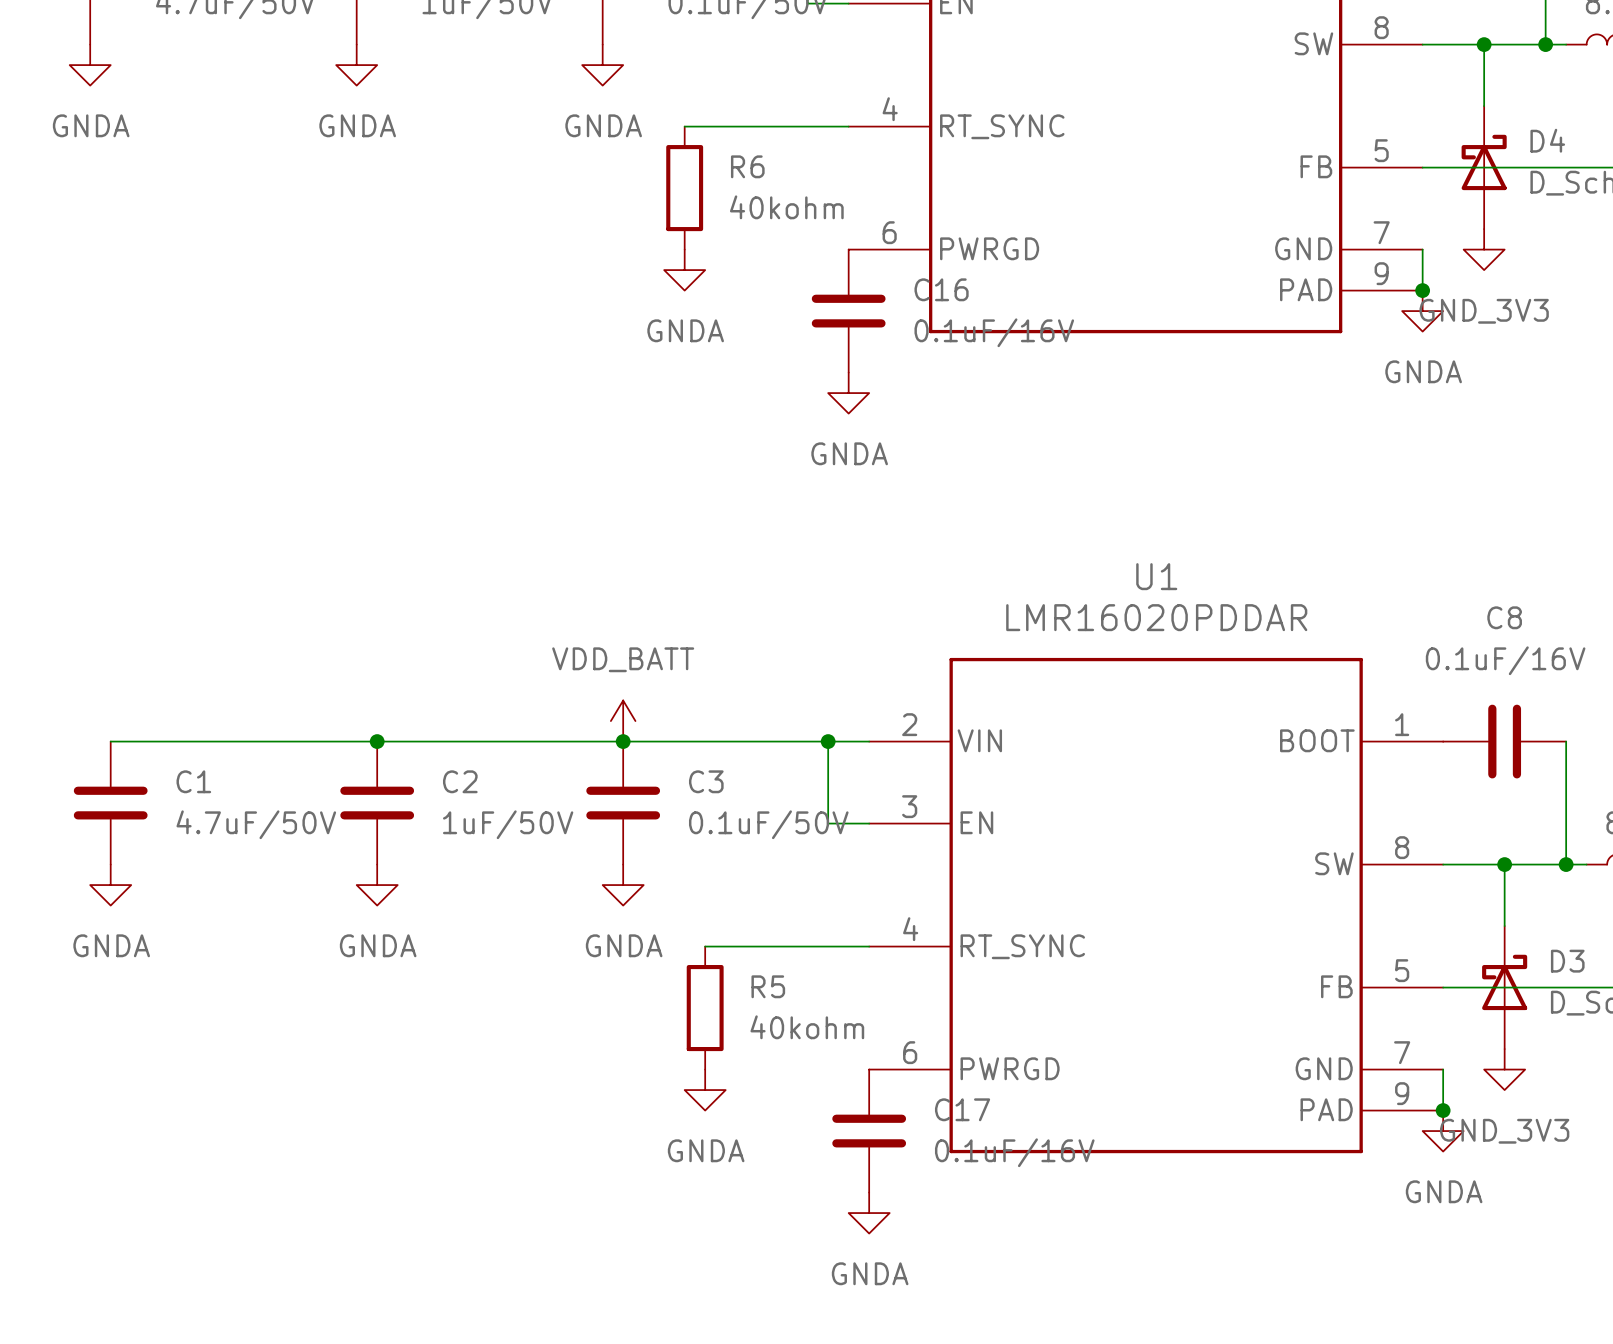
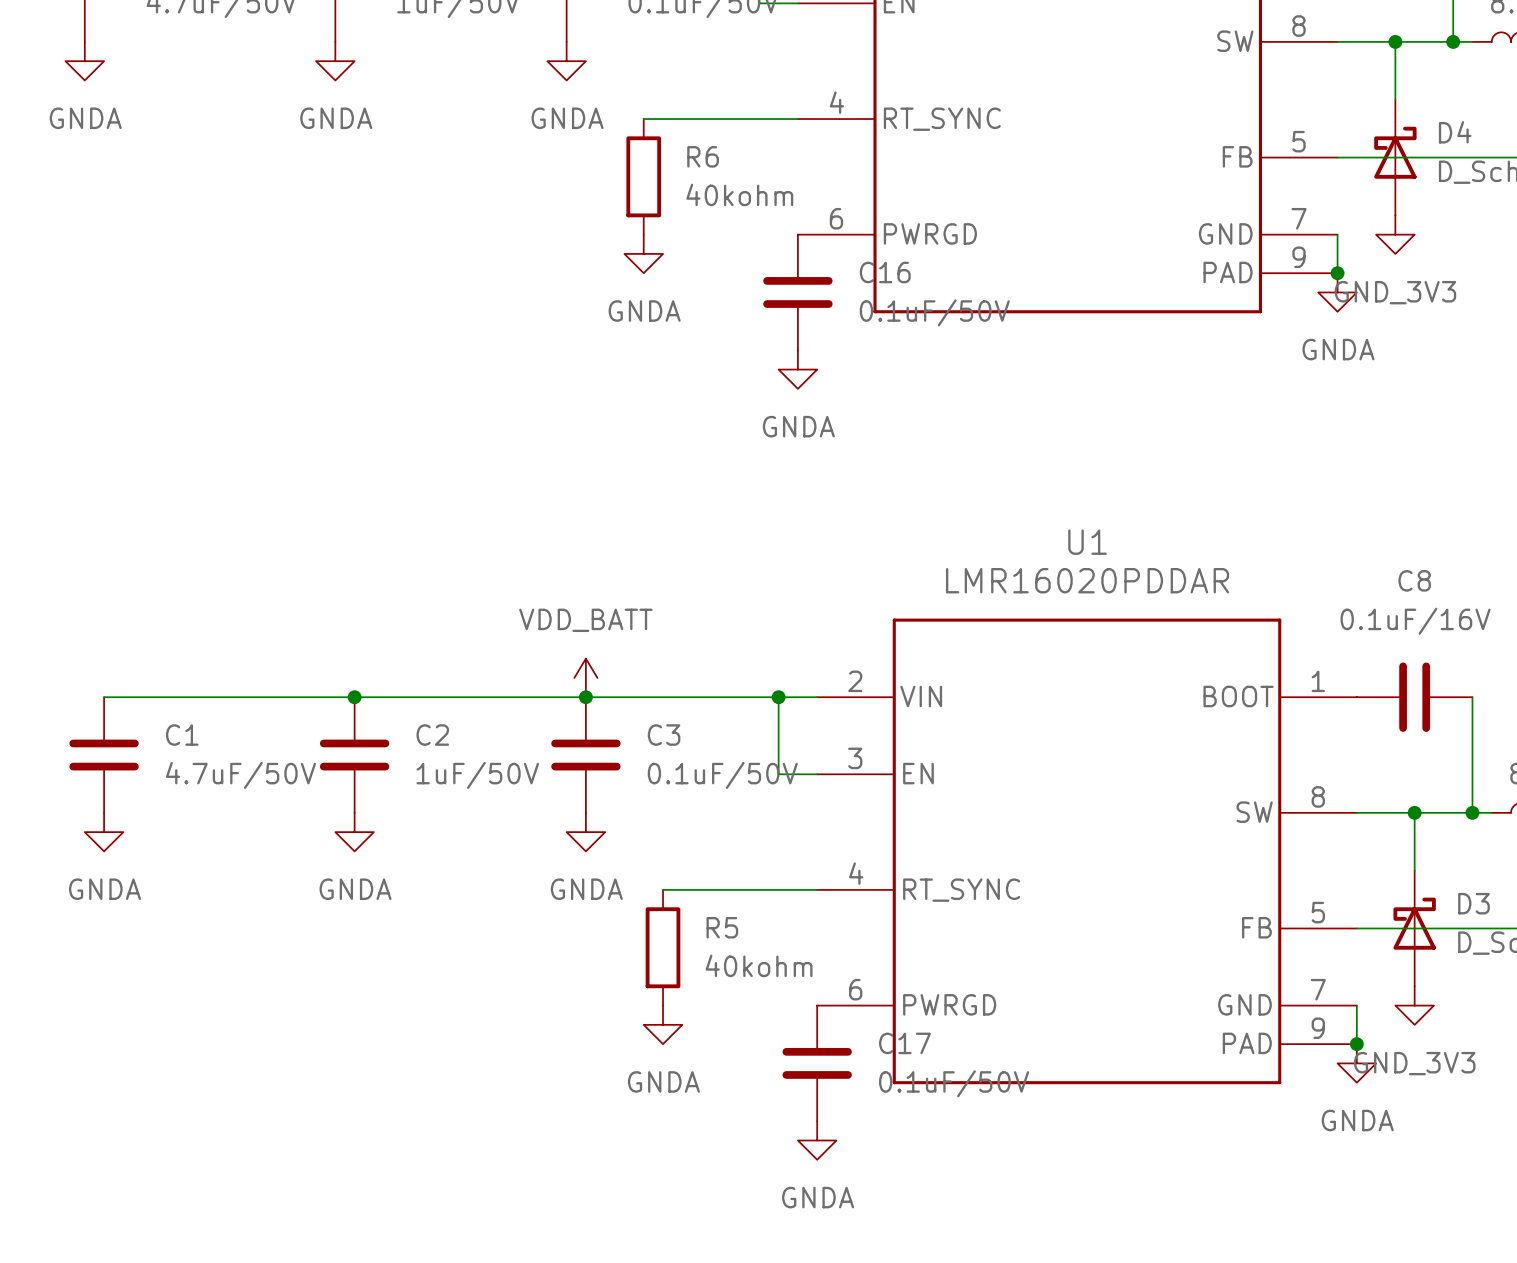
C16 value: 0.1uF/16V (994, 332) -> 0.1uF/50V (934, 312)
C17 value: 0.1uF/16V (1014, 1152) -> 0.1uF/50V (954, 1083)

